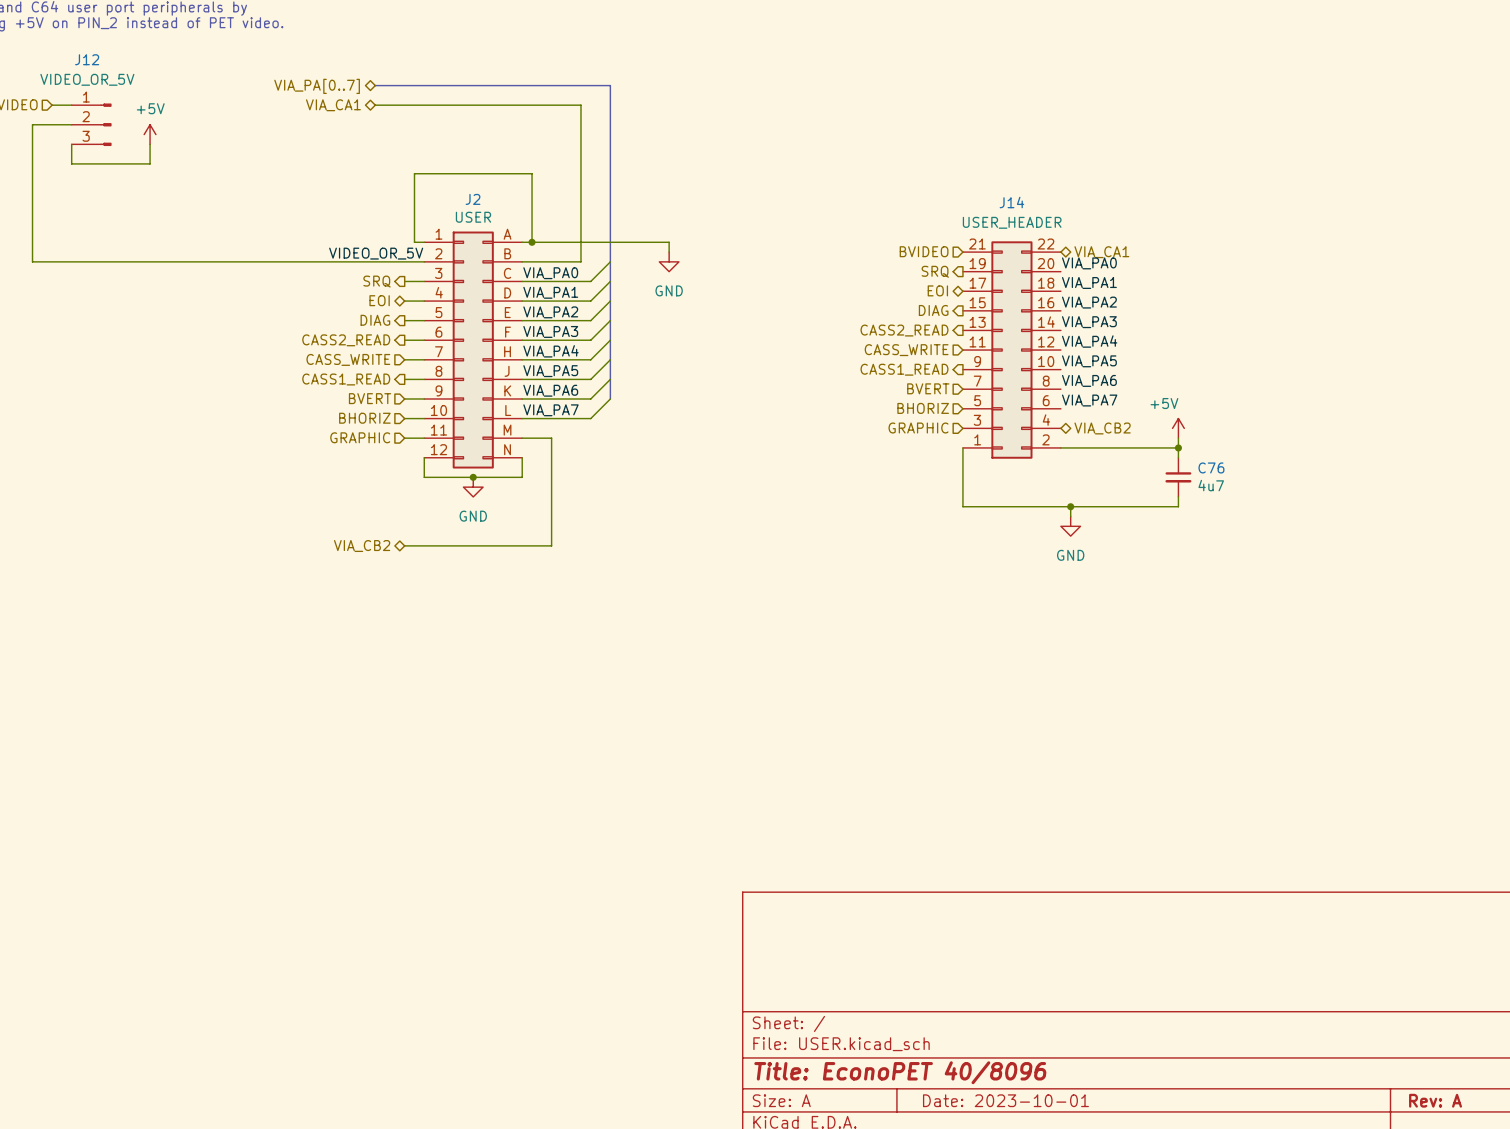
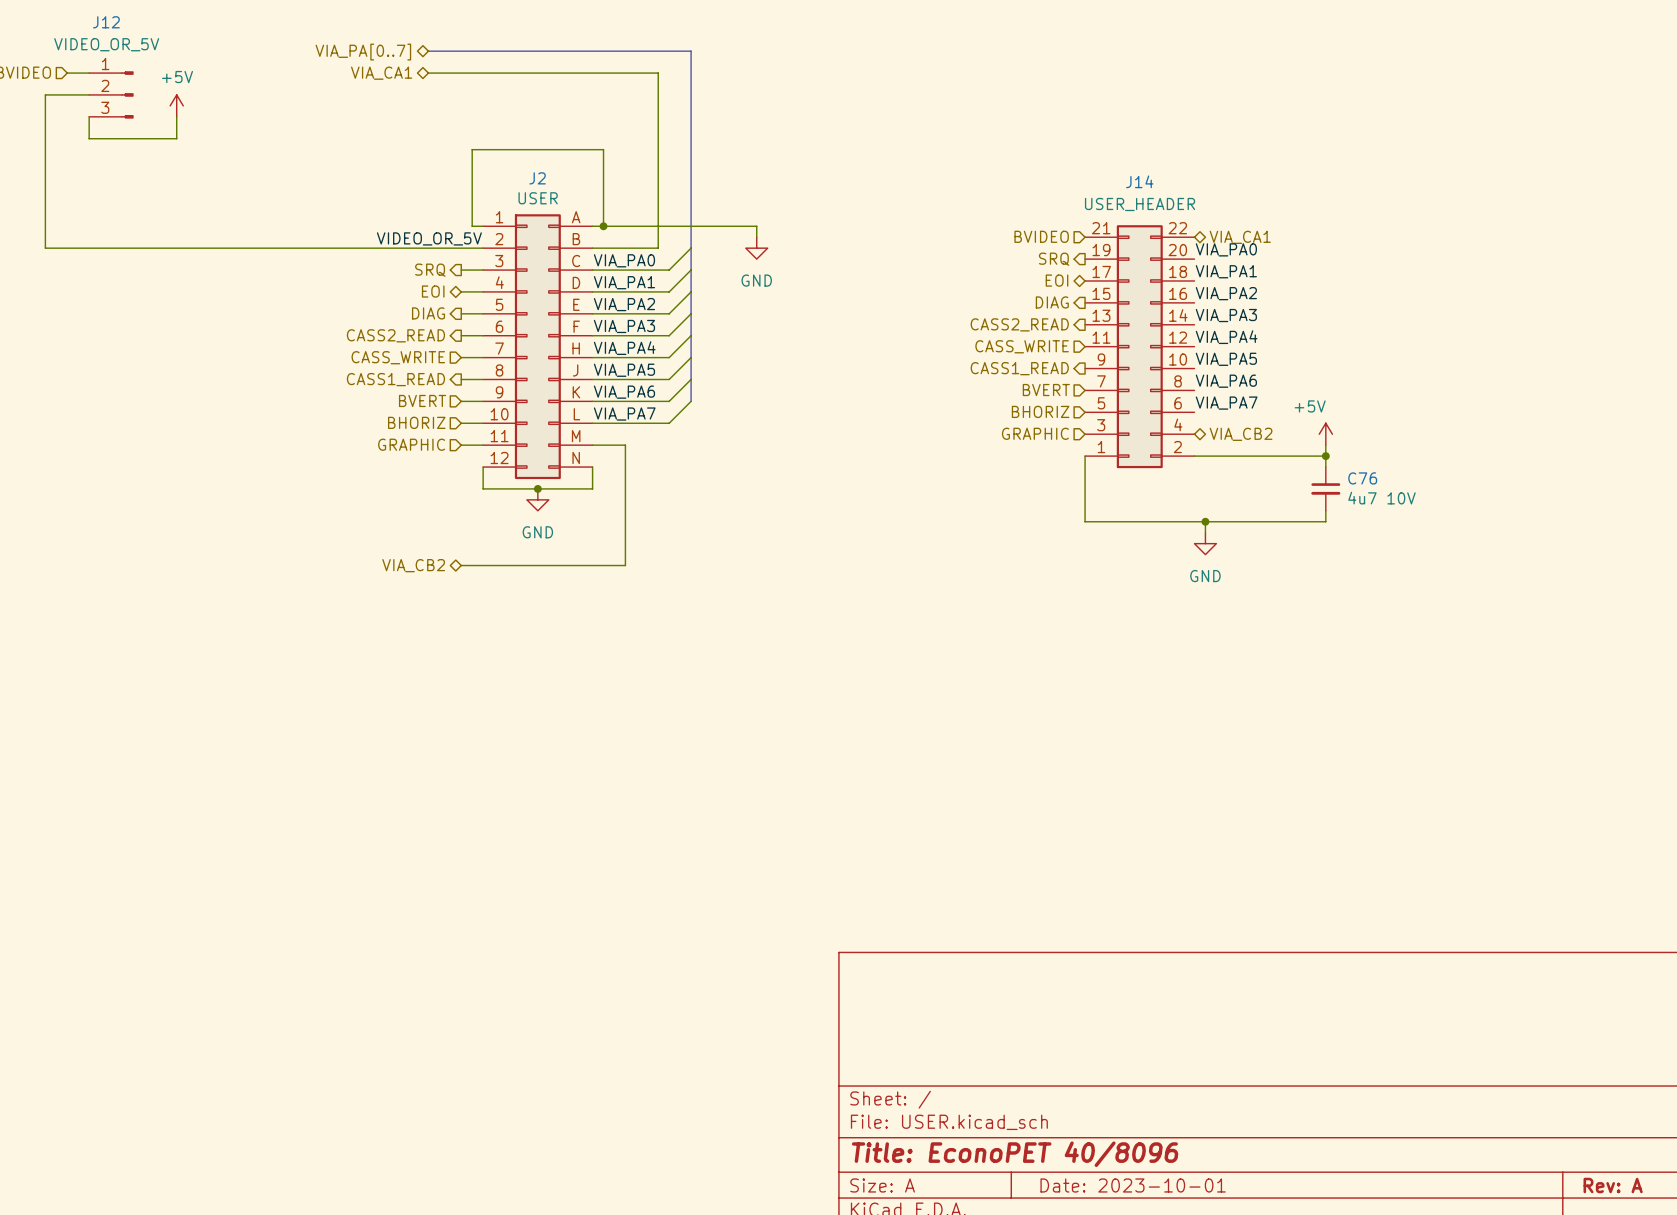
C76 value: 4u7 (1211, 485) -> 4u7 10V (1382, 498)

